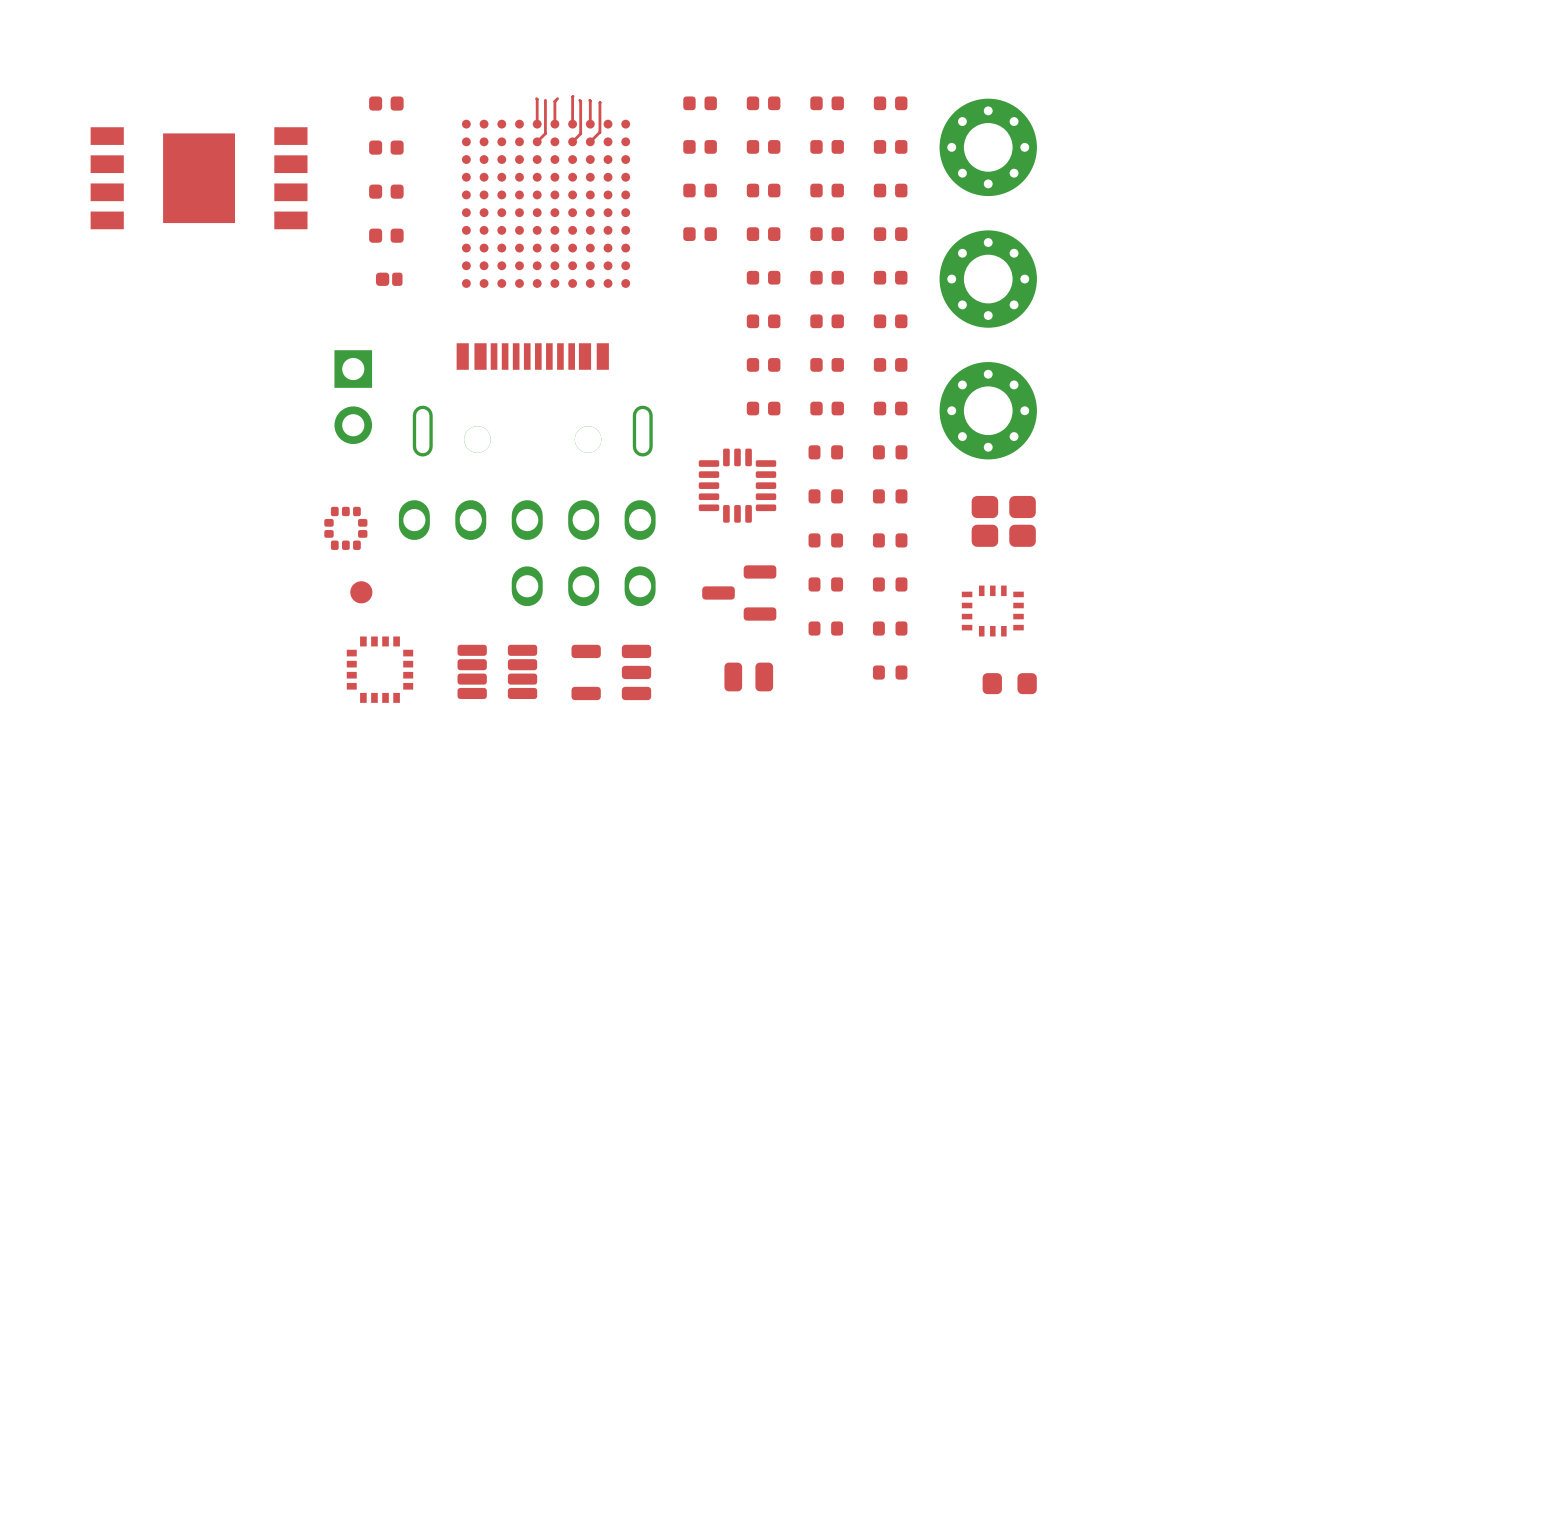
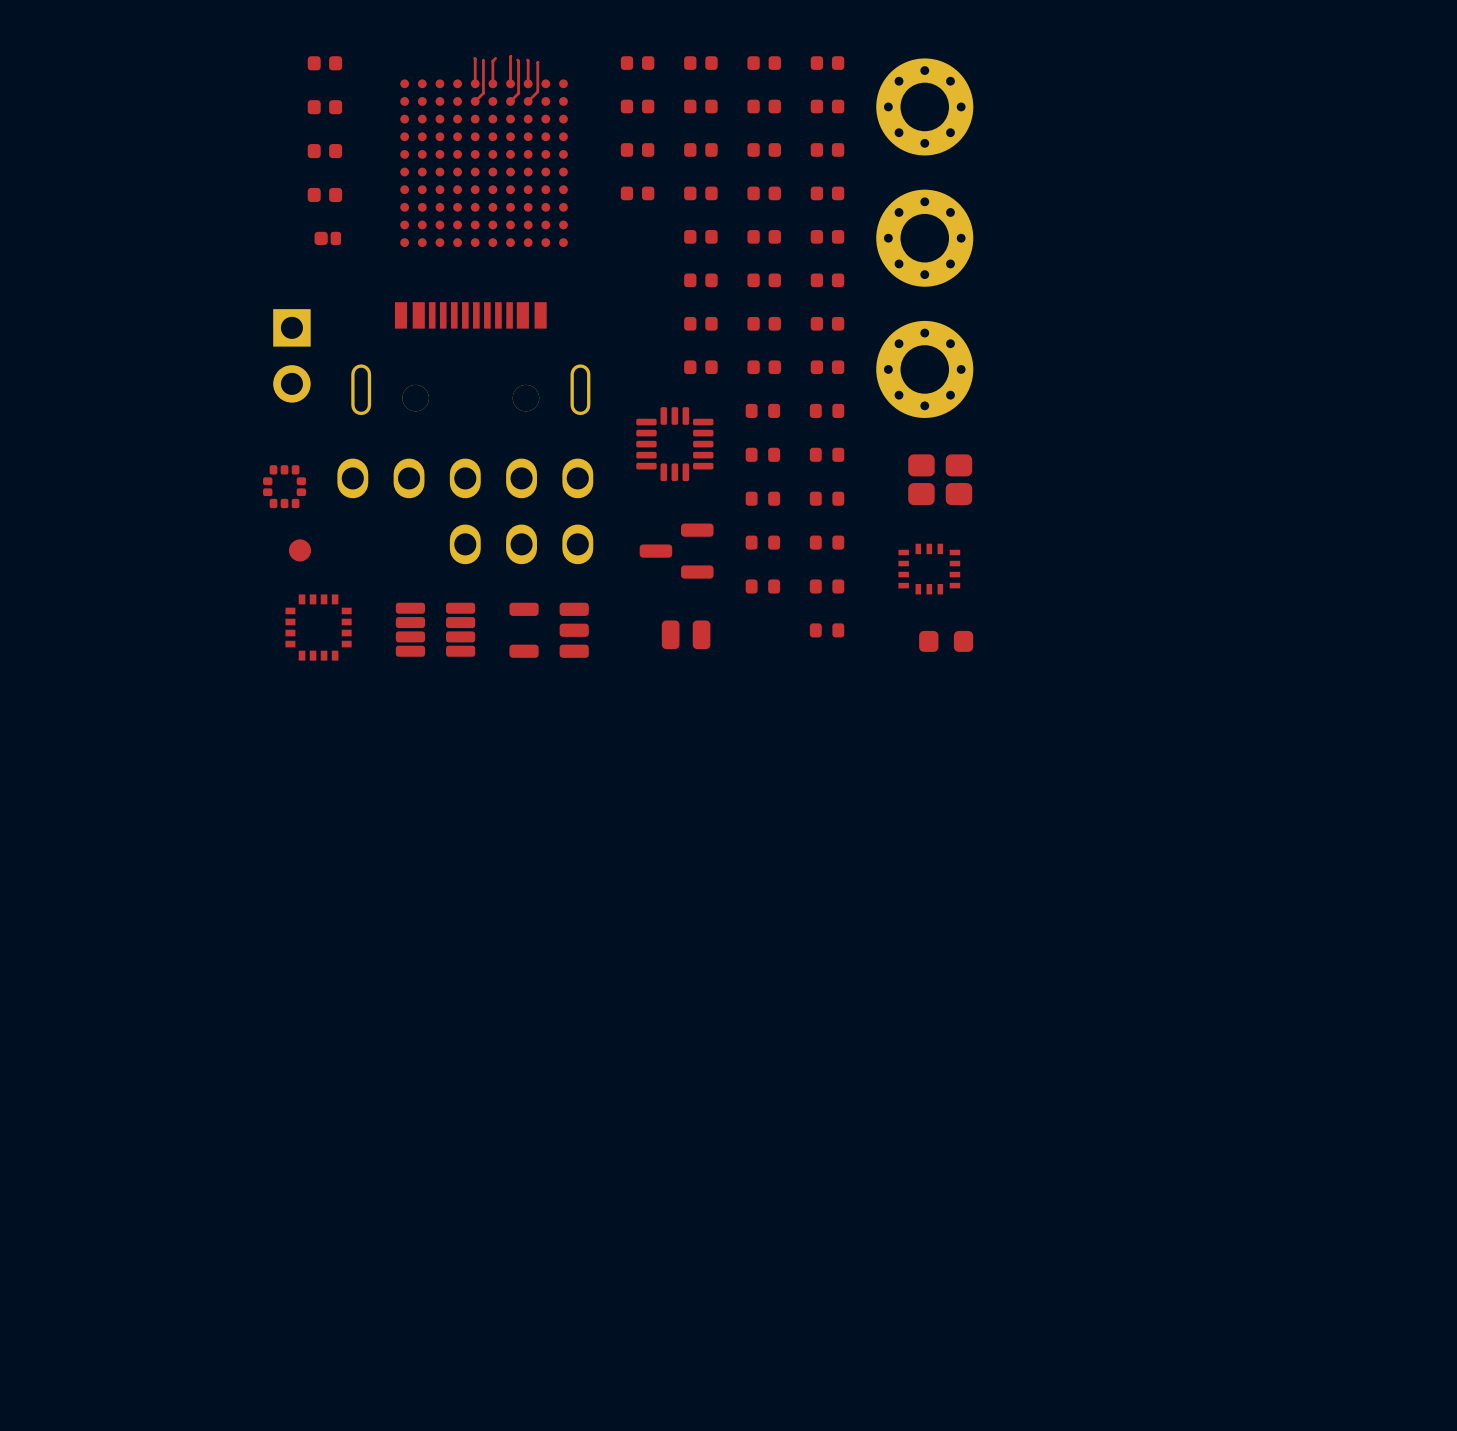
part: (199, 178) -> none

